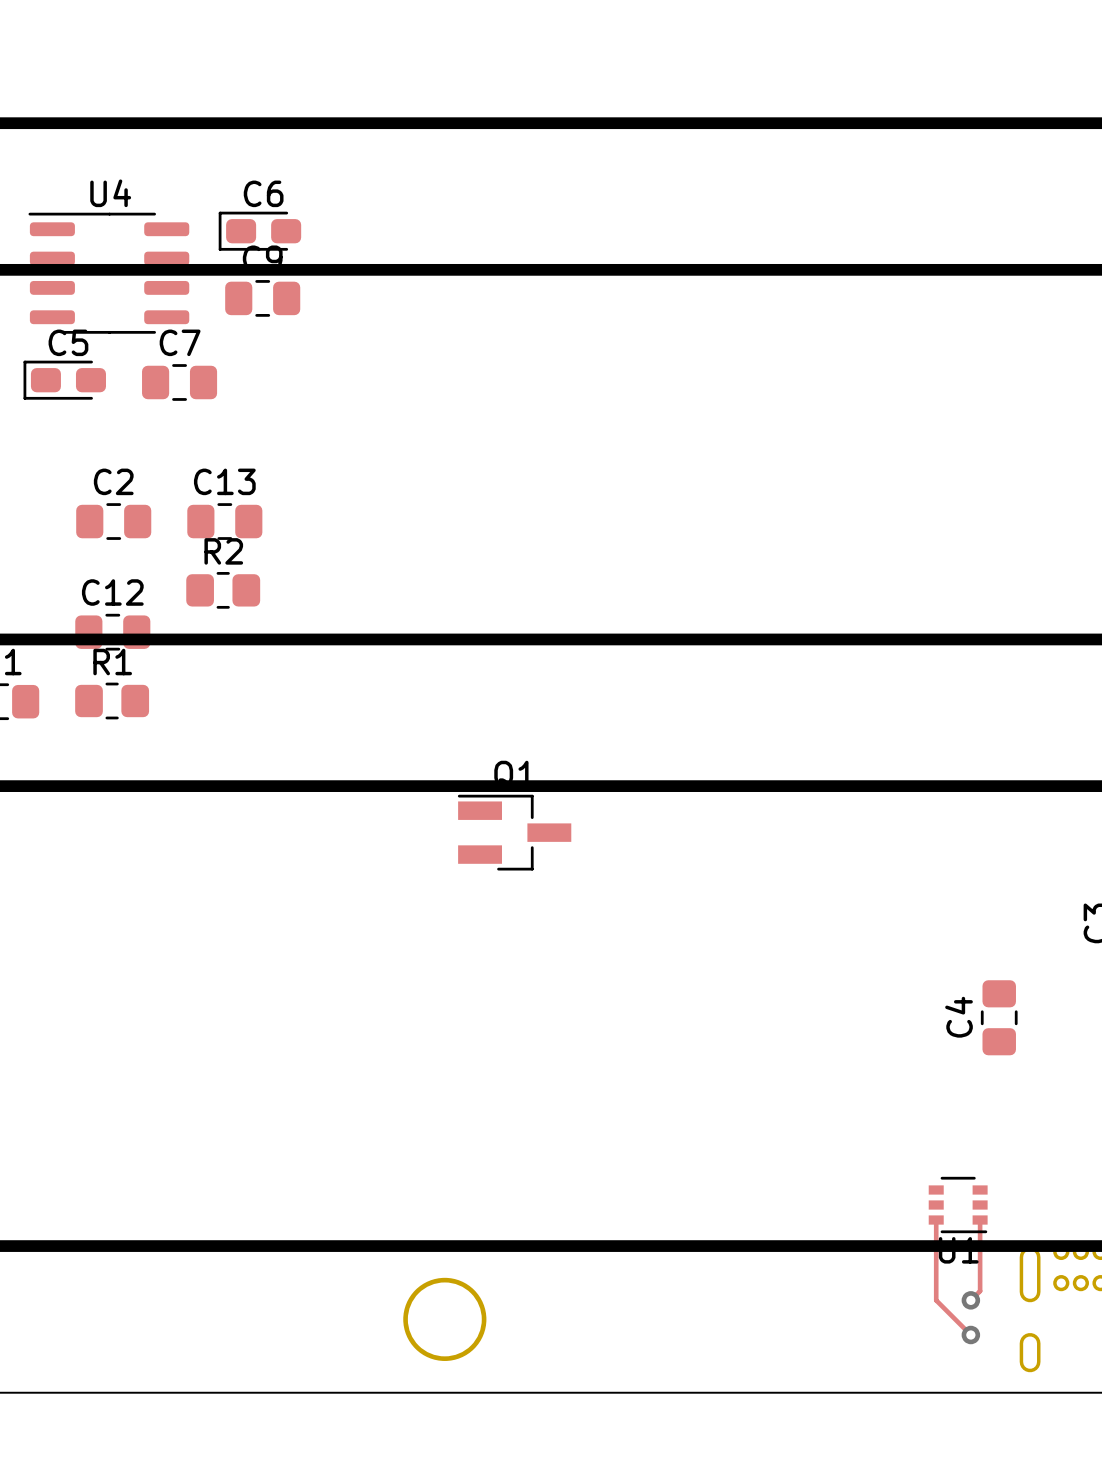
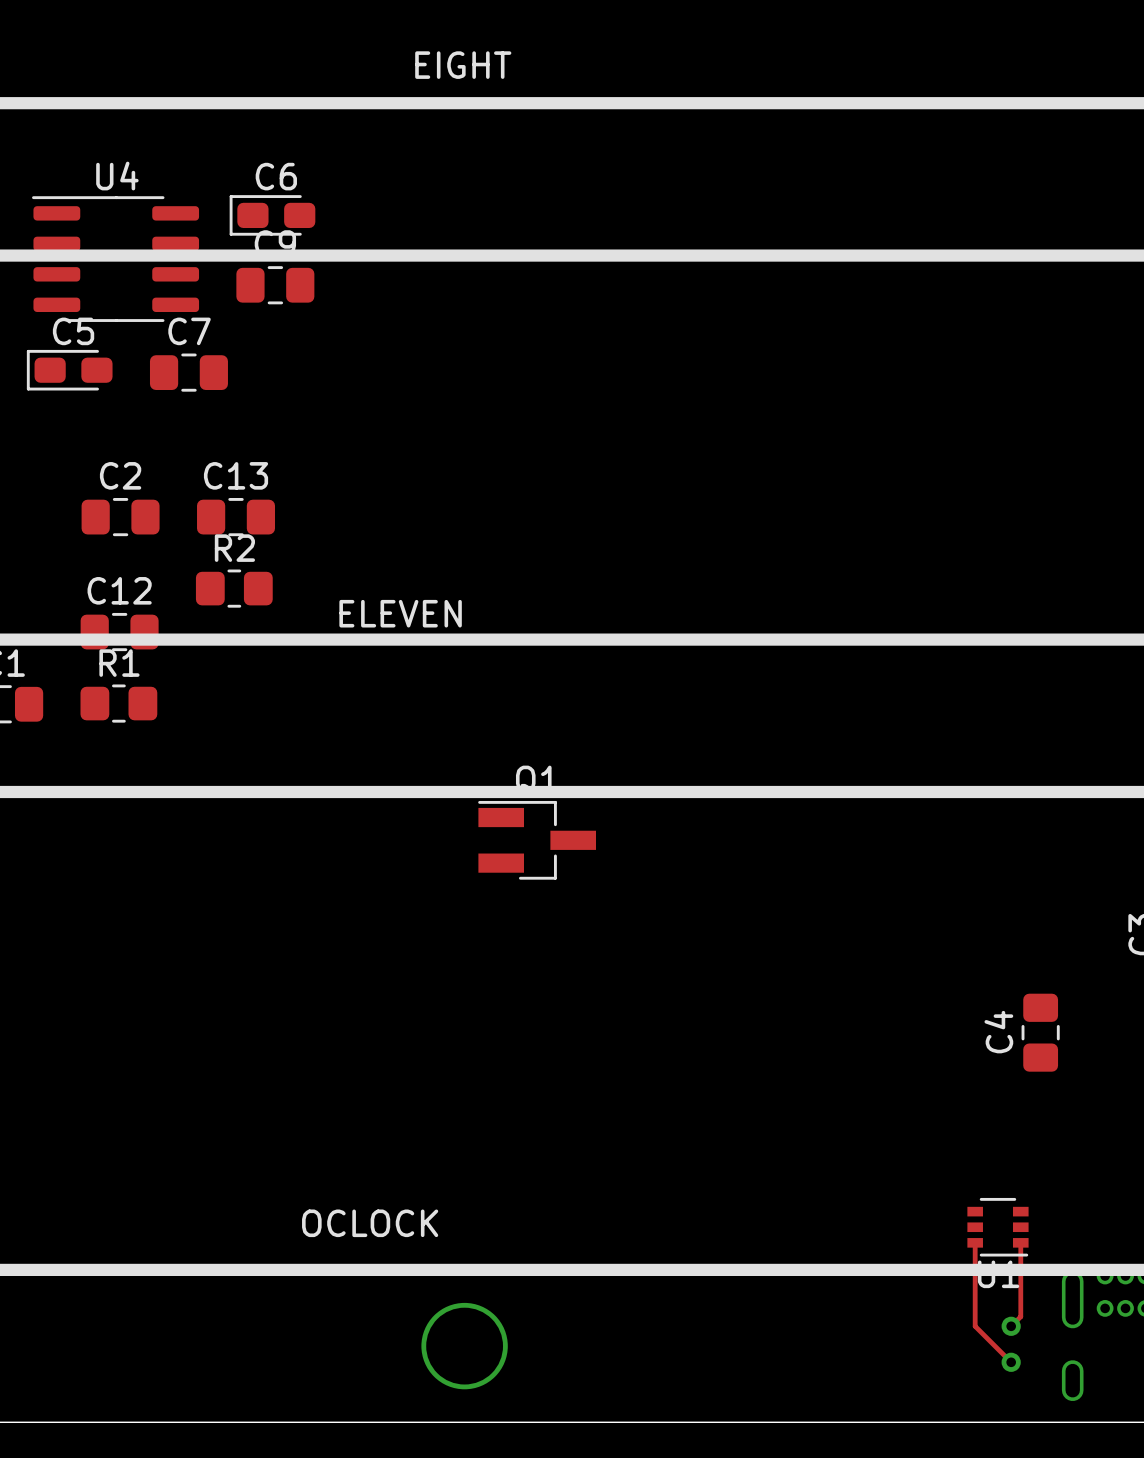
text: none -> EIGHT (463, 65)
text: none -> ELEVEN (400, 613)
text: none -> OCLOCK (370, 1223)

